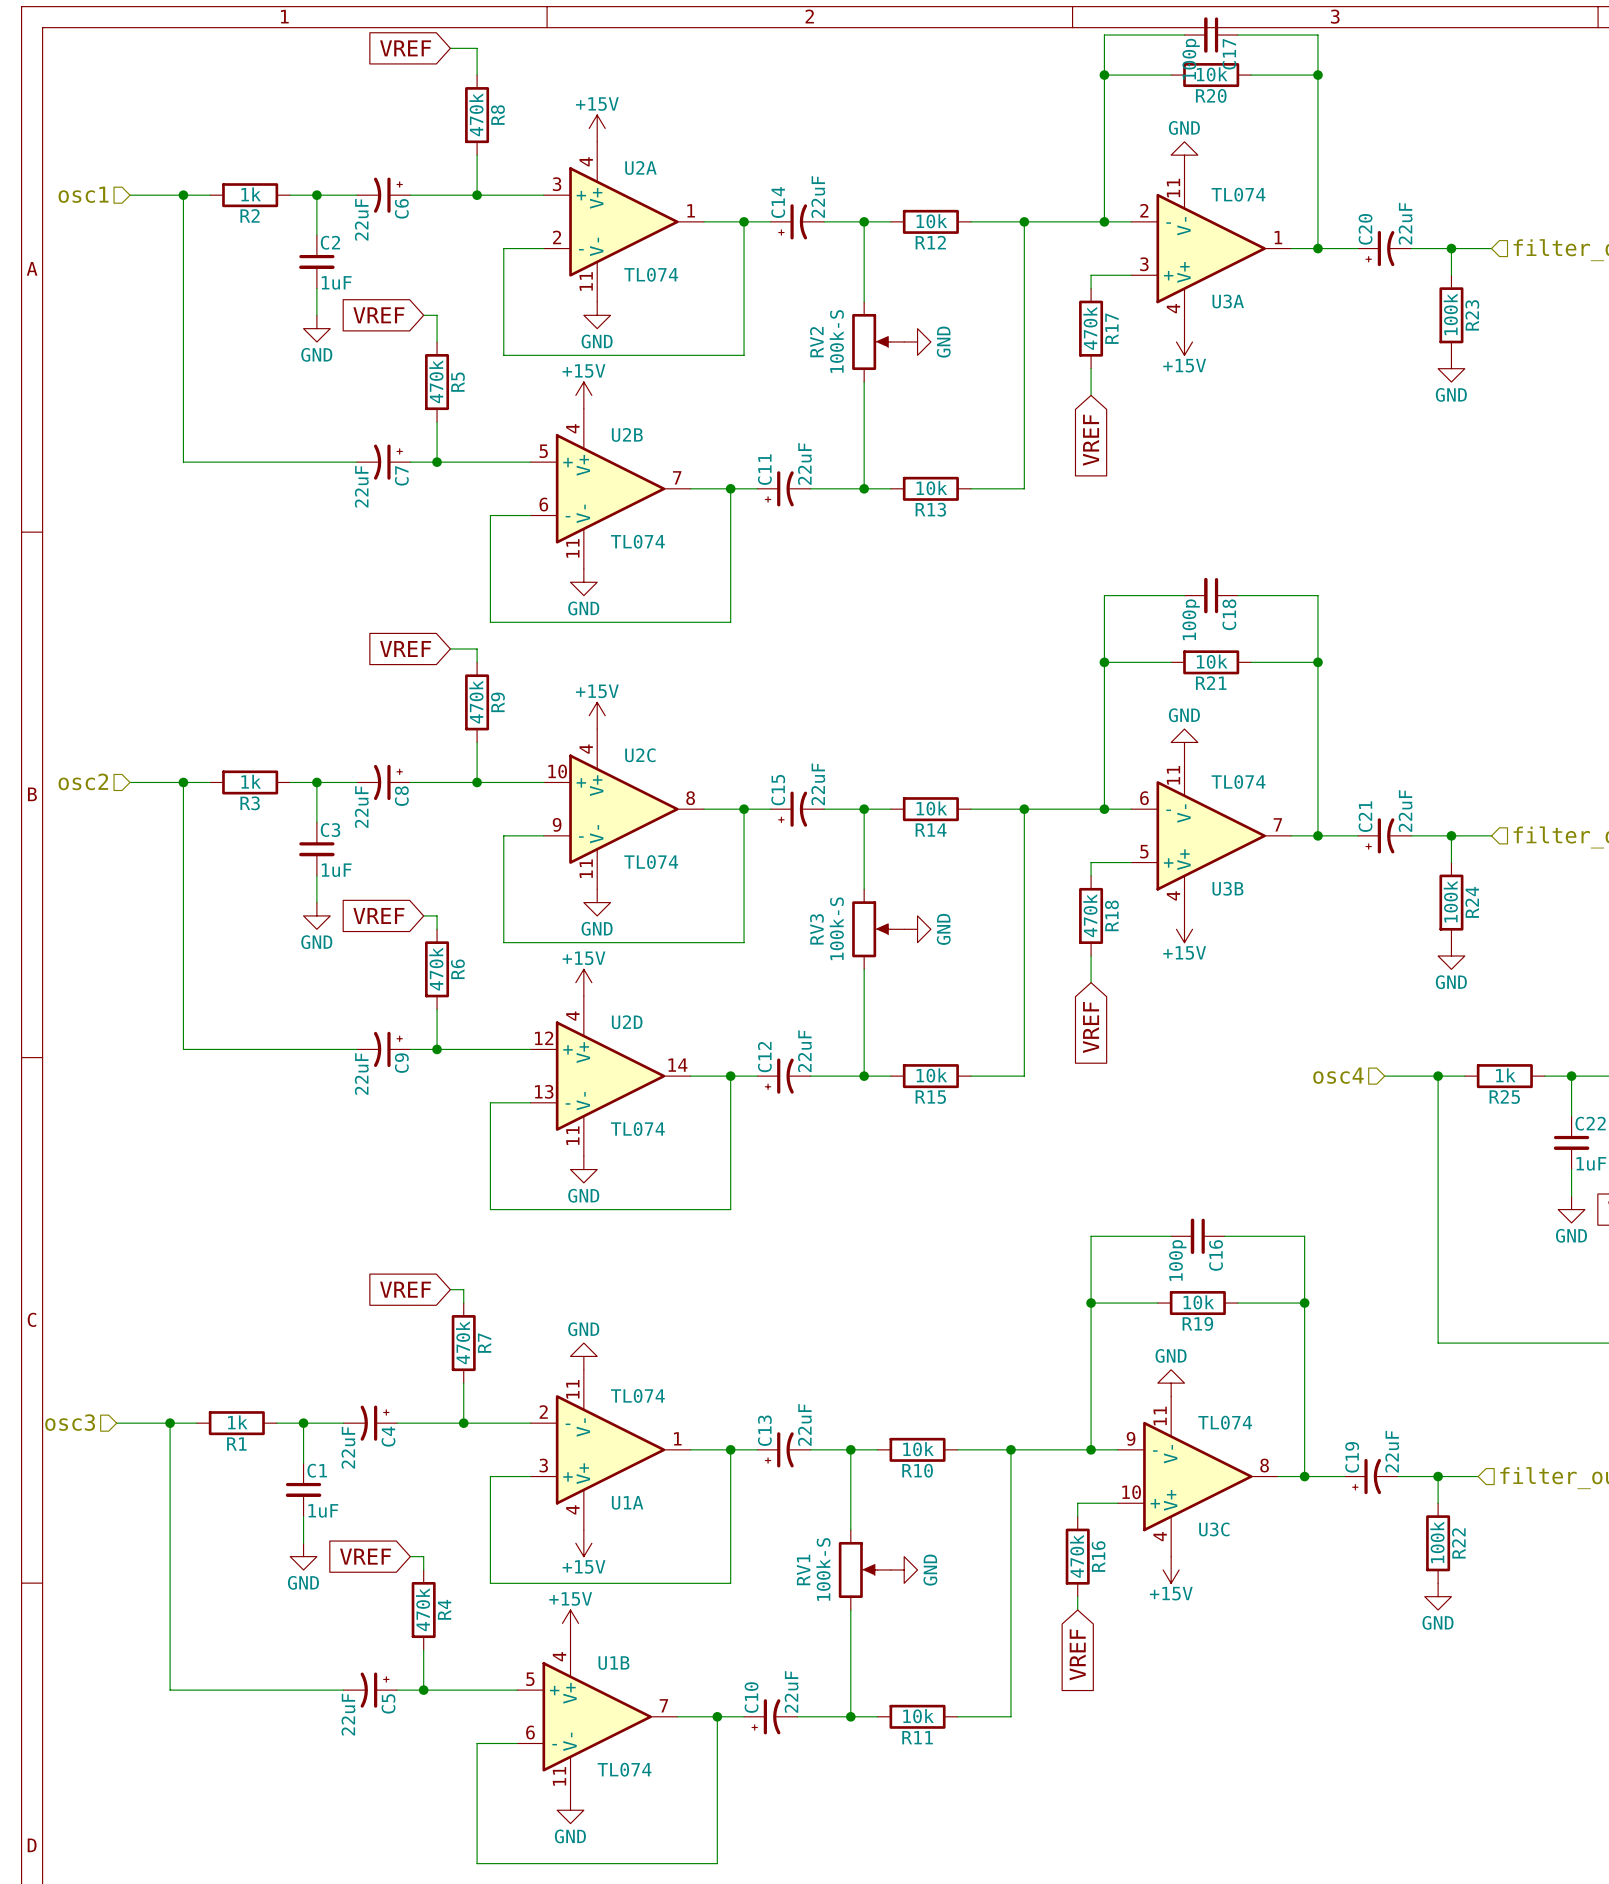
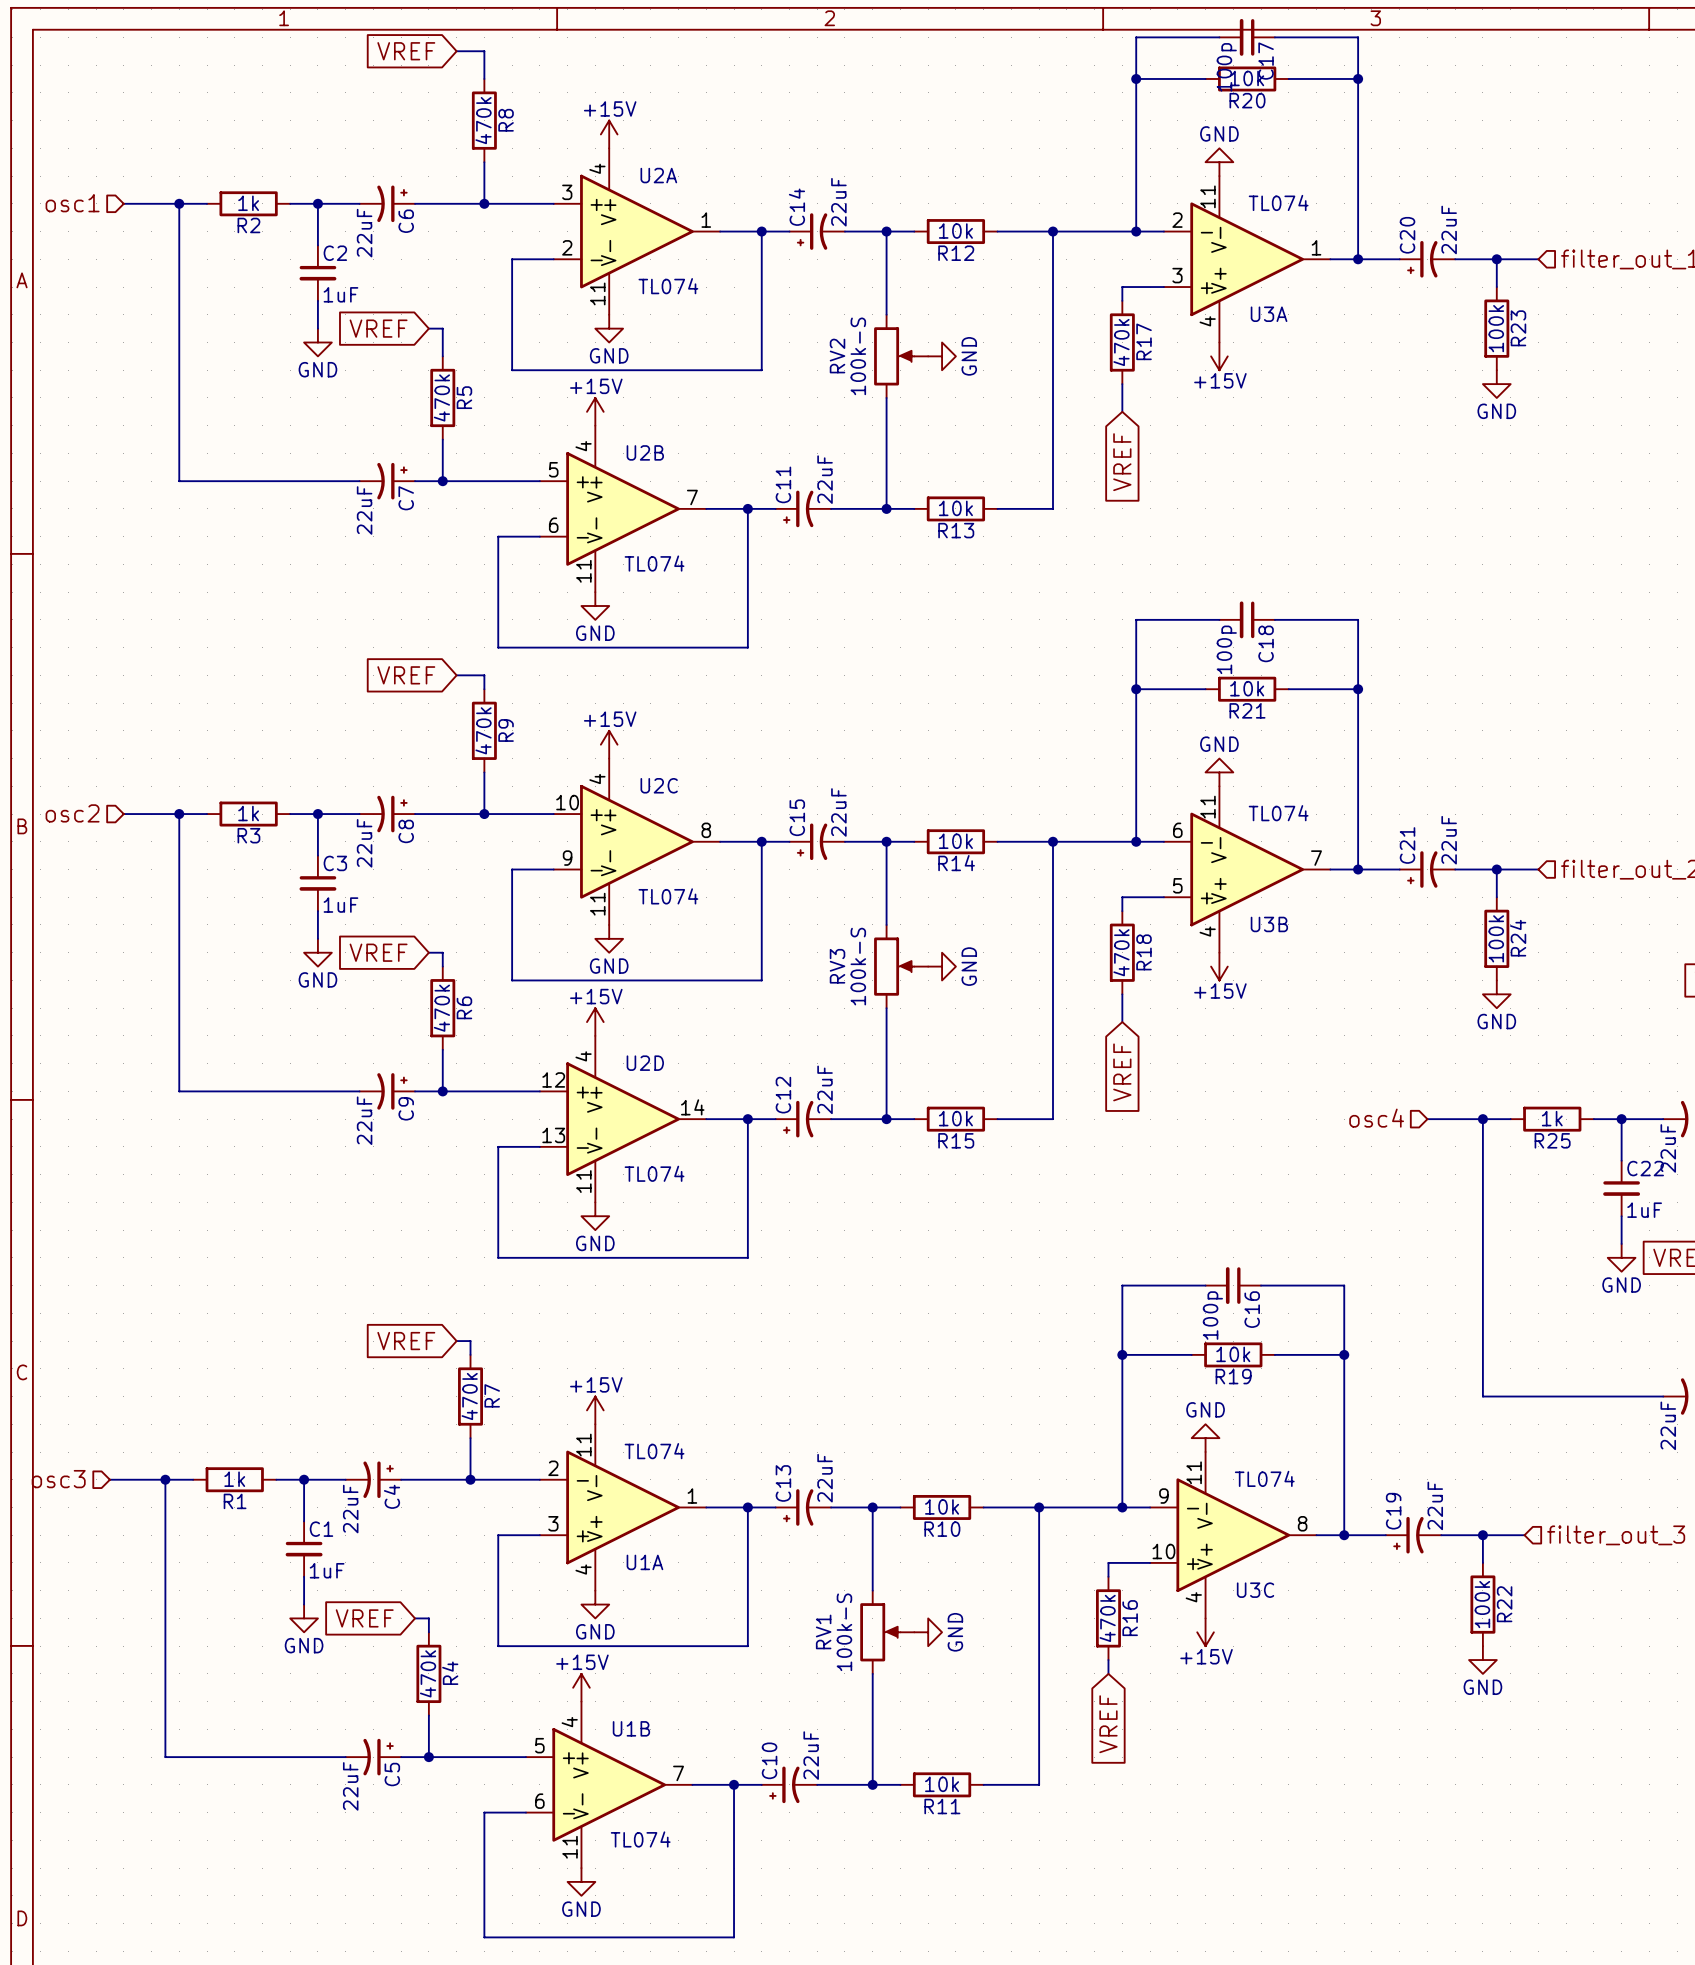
power symbol: GND (583, 1356) -> +15V (595, 1410)
power symbol: +15V (583, 1543) -> GND (595, 1604)

